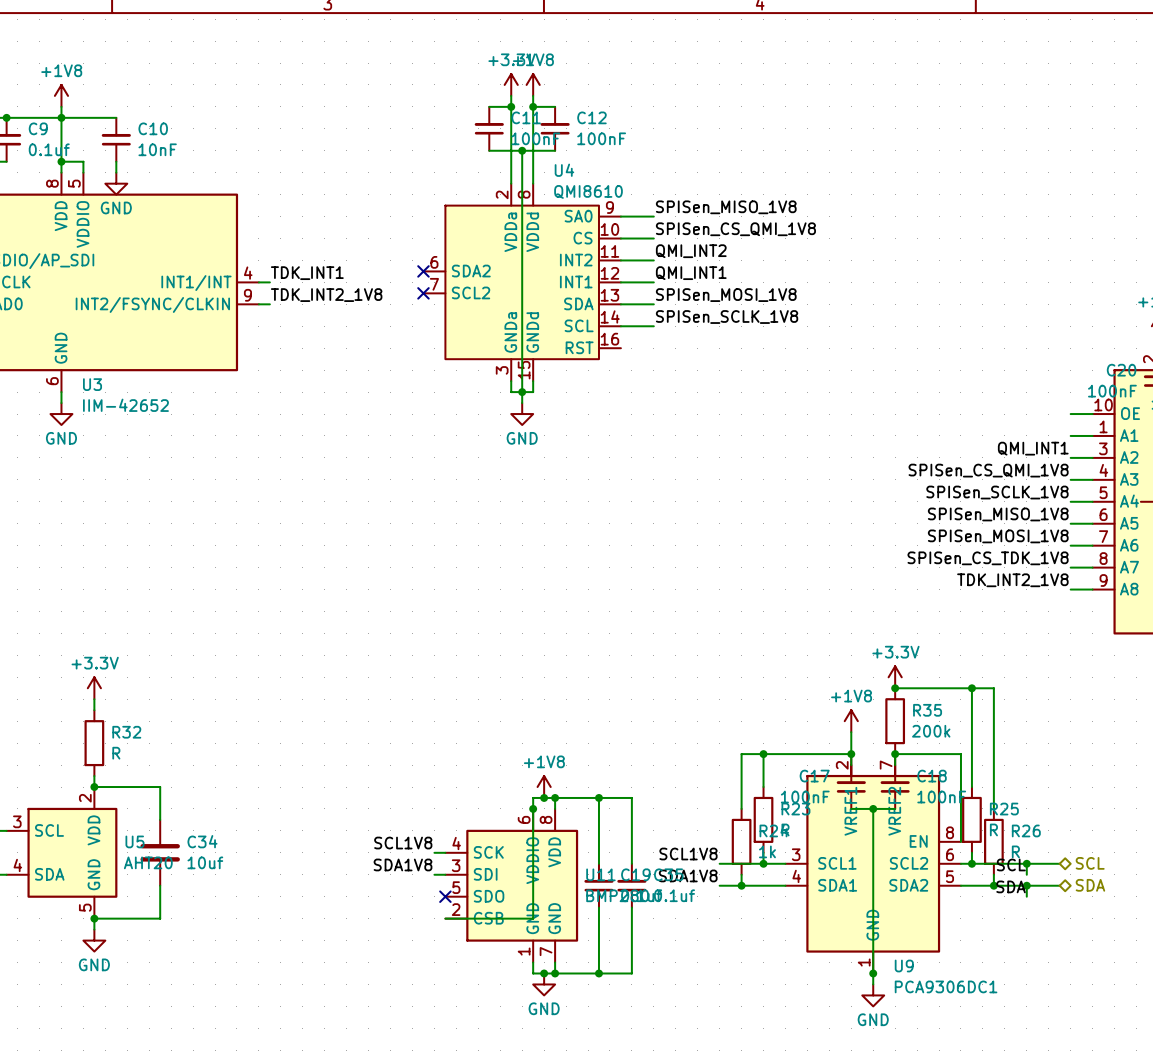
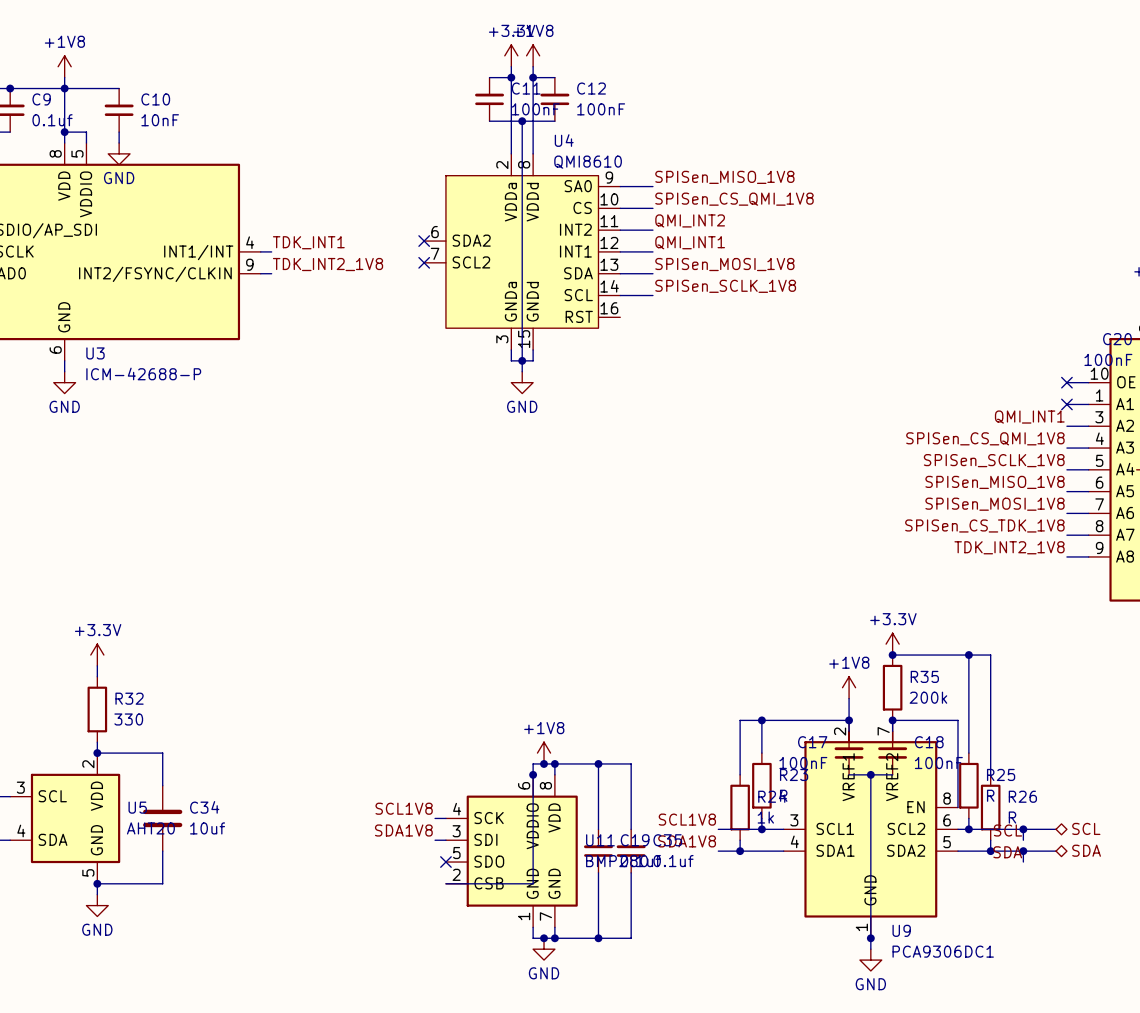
U3 value: IIM-42652 (125, 405) -> ICM-42688-P (143, 373)
no-connect mark: none -> (1066, 382)
no-connect mark: none -> (1066, 404)
R32 value: R (116, 753) -> 330 (128, 719)

